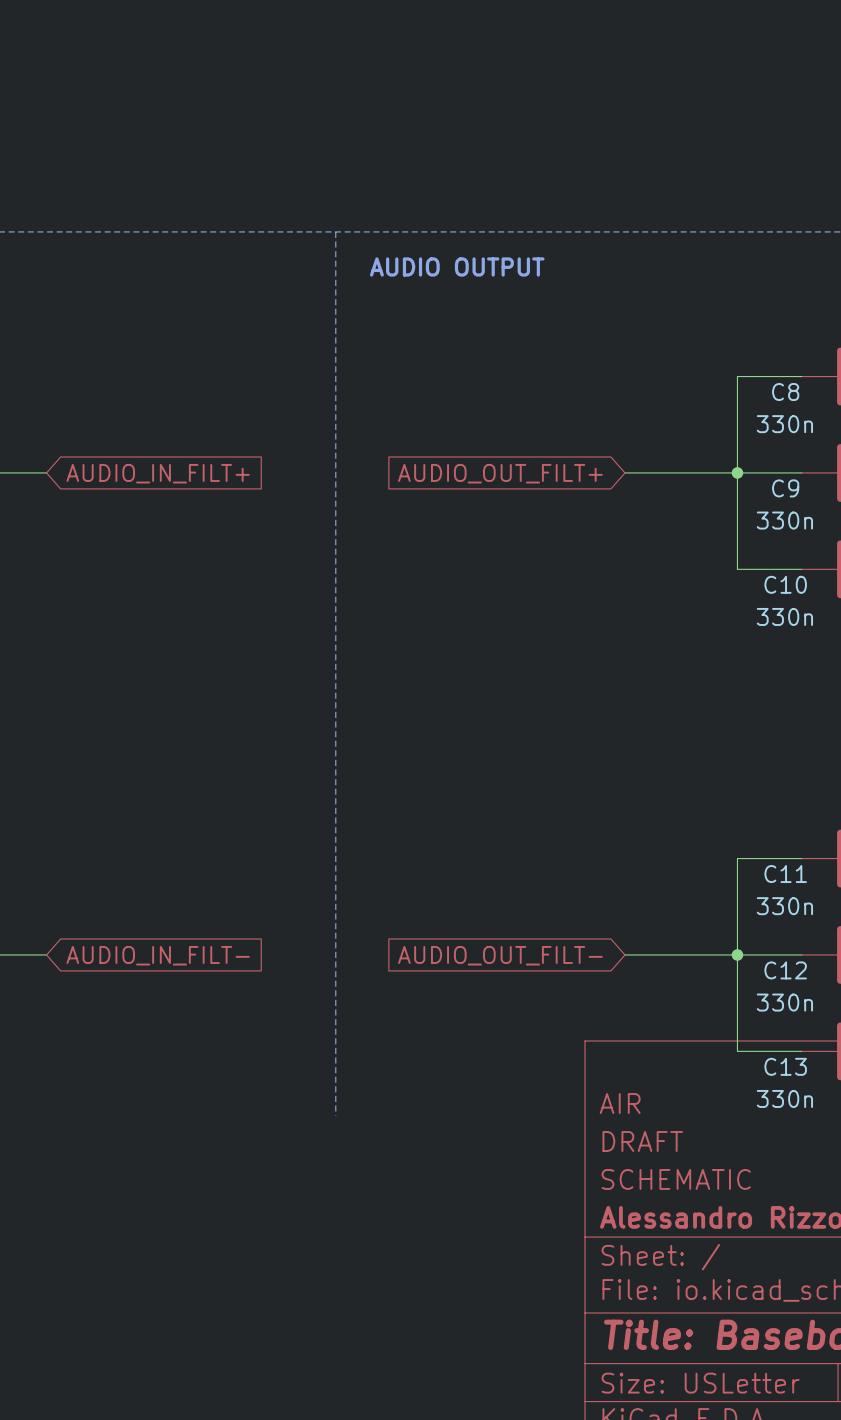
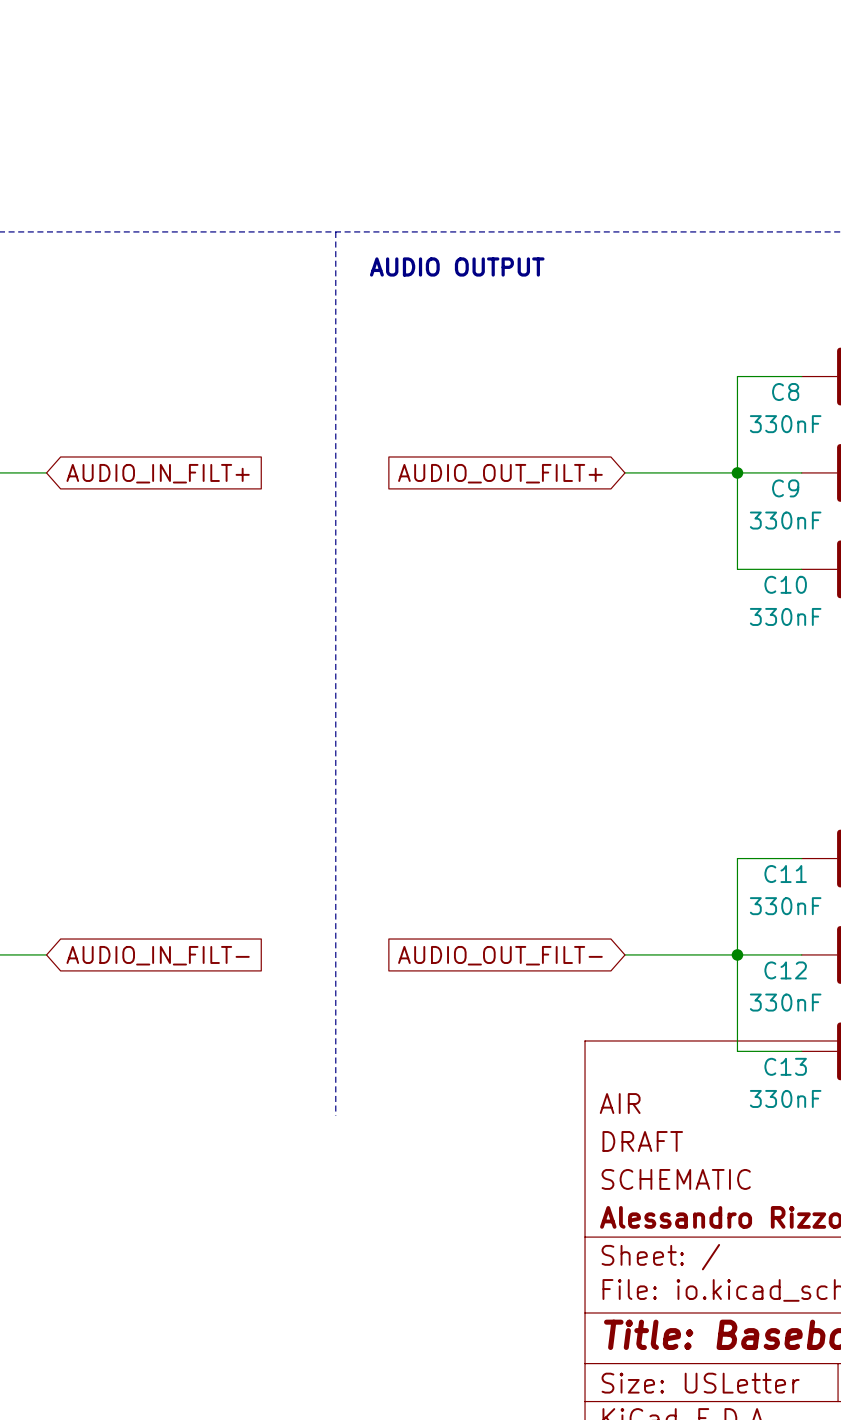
C8 value: 330n (784, 424) -> 330nF (785, 424)
C9 value: 330n (784, 520) -> 330nF (785, 520)
C10 value: 330n (784, 616) -> 330nF (785, 616)
C11 value: 330n (784, 906) -> 330nF (785, 906)
C12 value: 330n (784, 1002) -> 330nF (785, 1002)
C13 value: 330n (784, 1098) -> 330nF (785, 1098)

